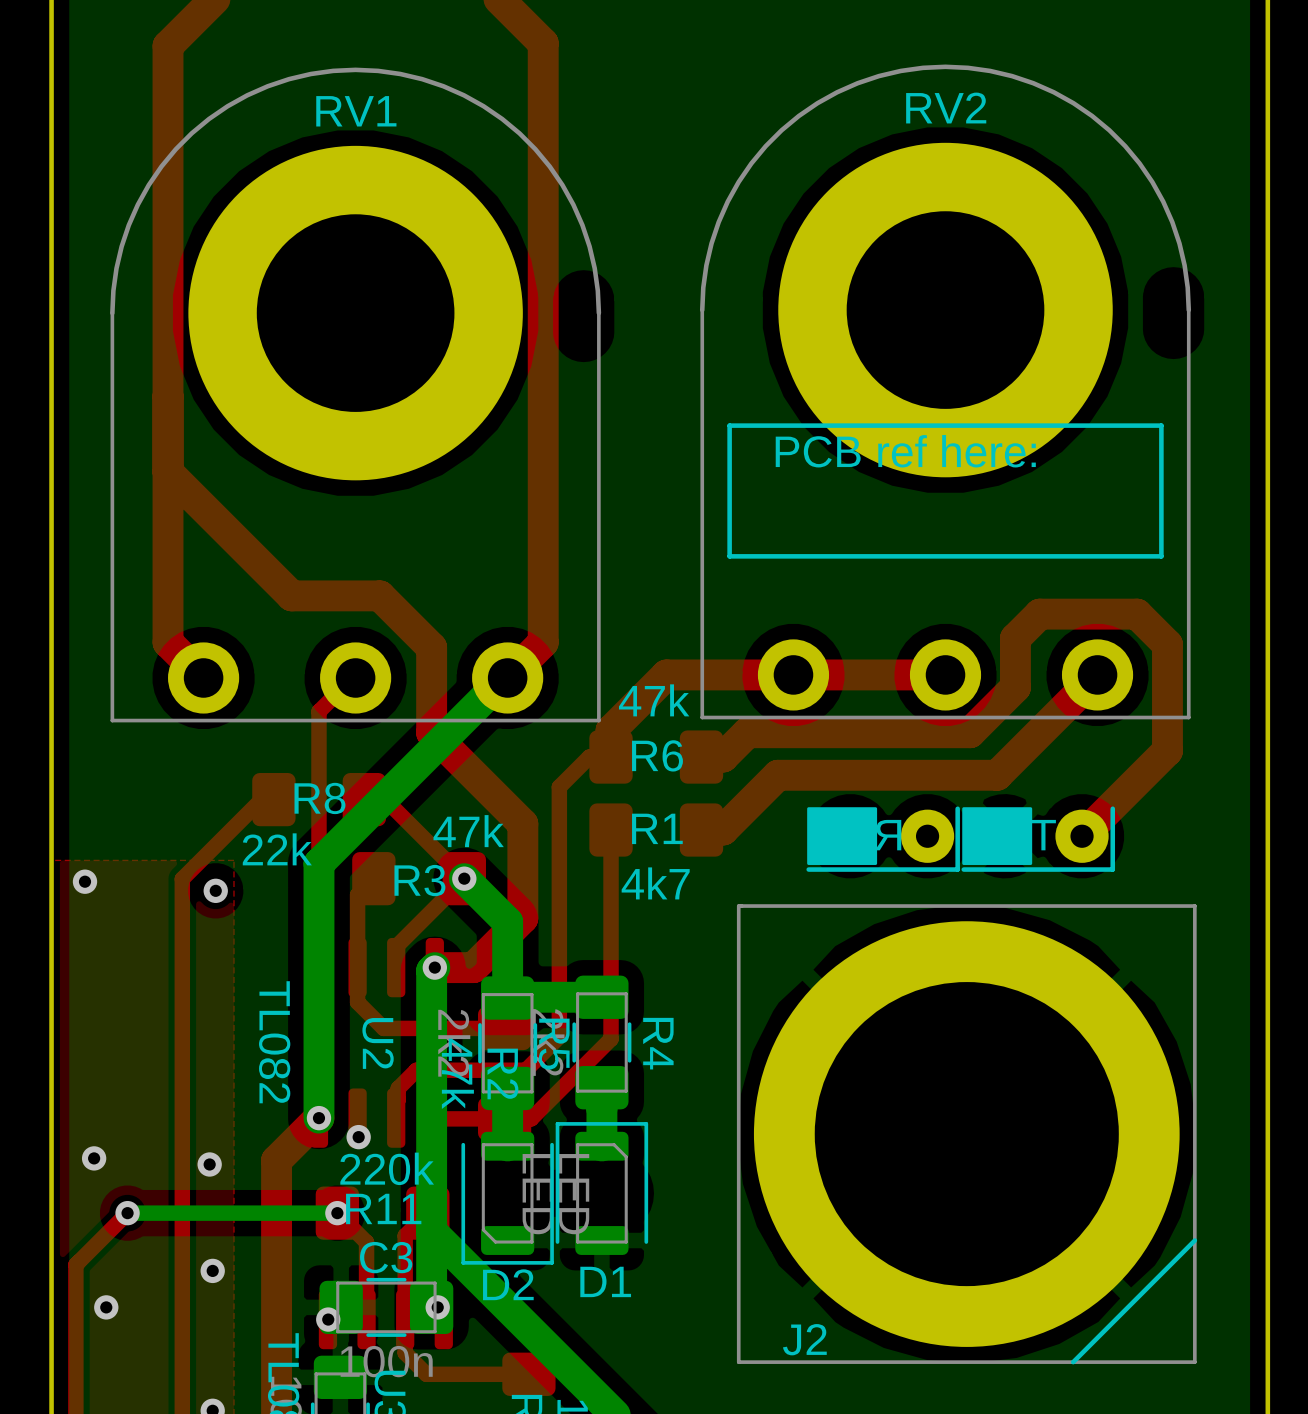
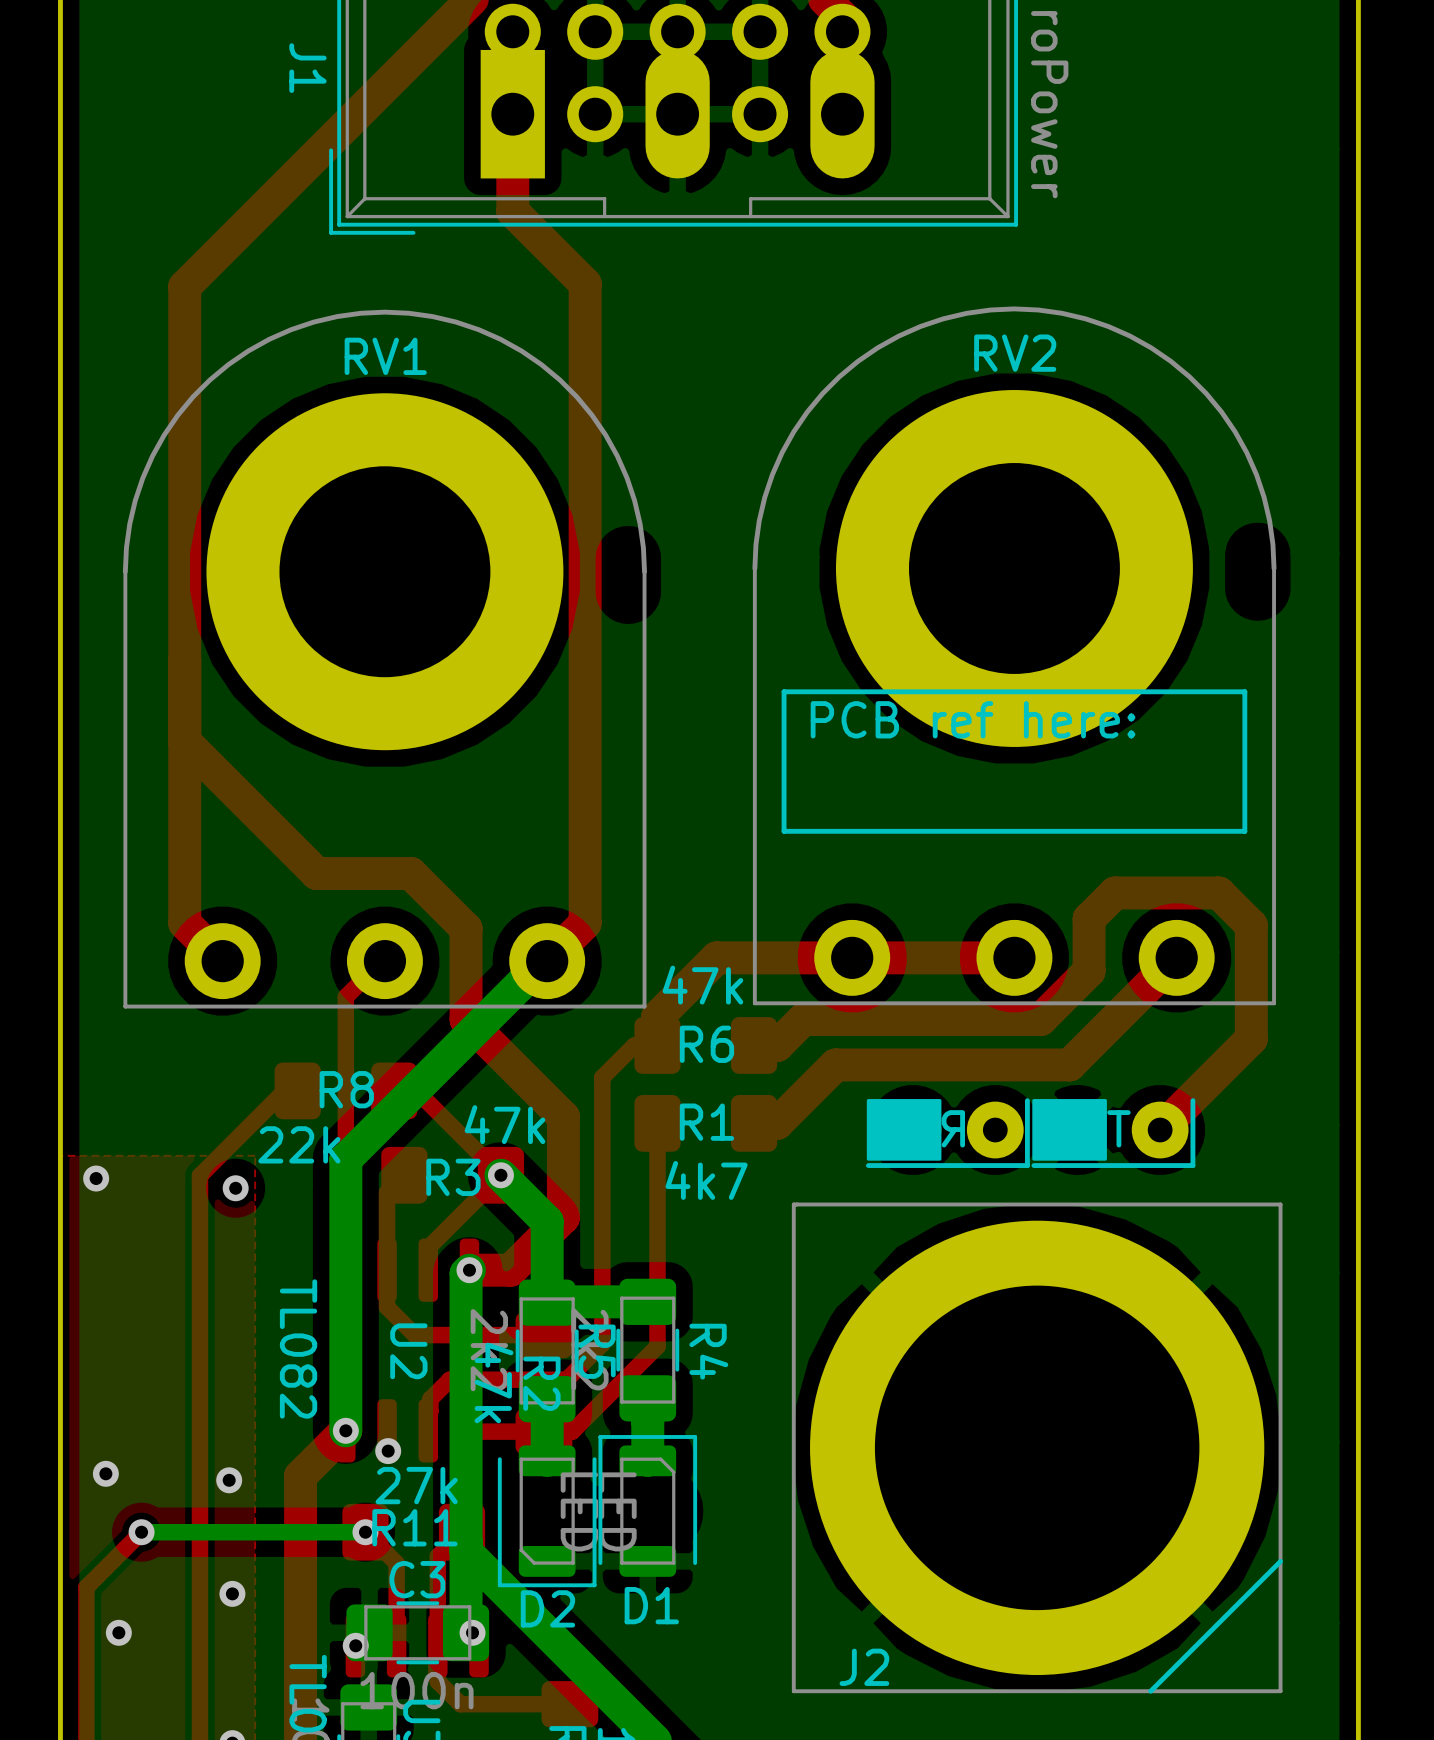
R11 value: 220k (387, 1168) -> 27k (416, 1485)

